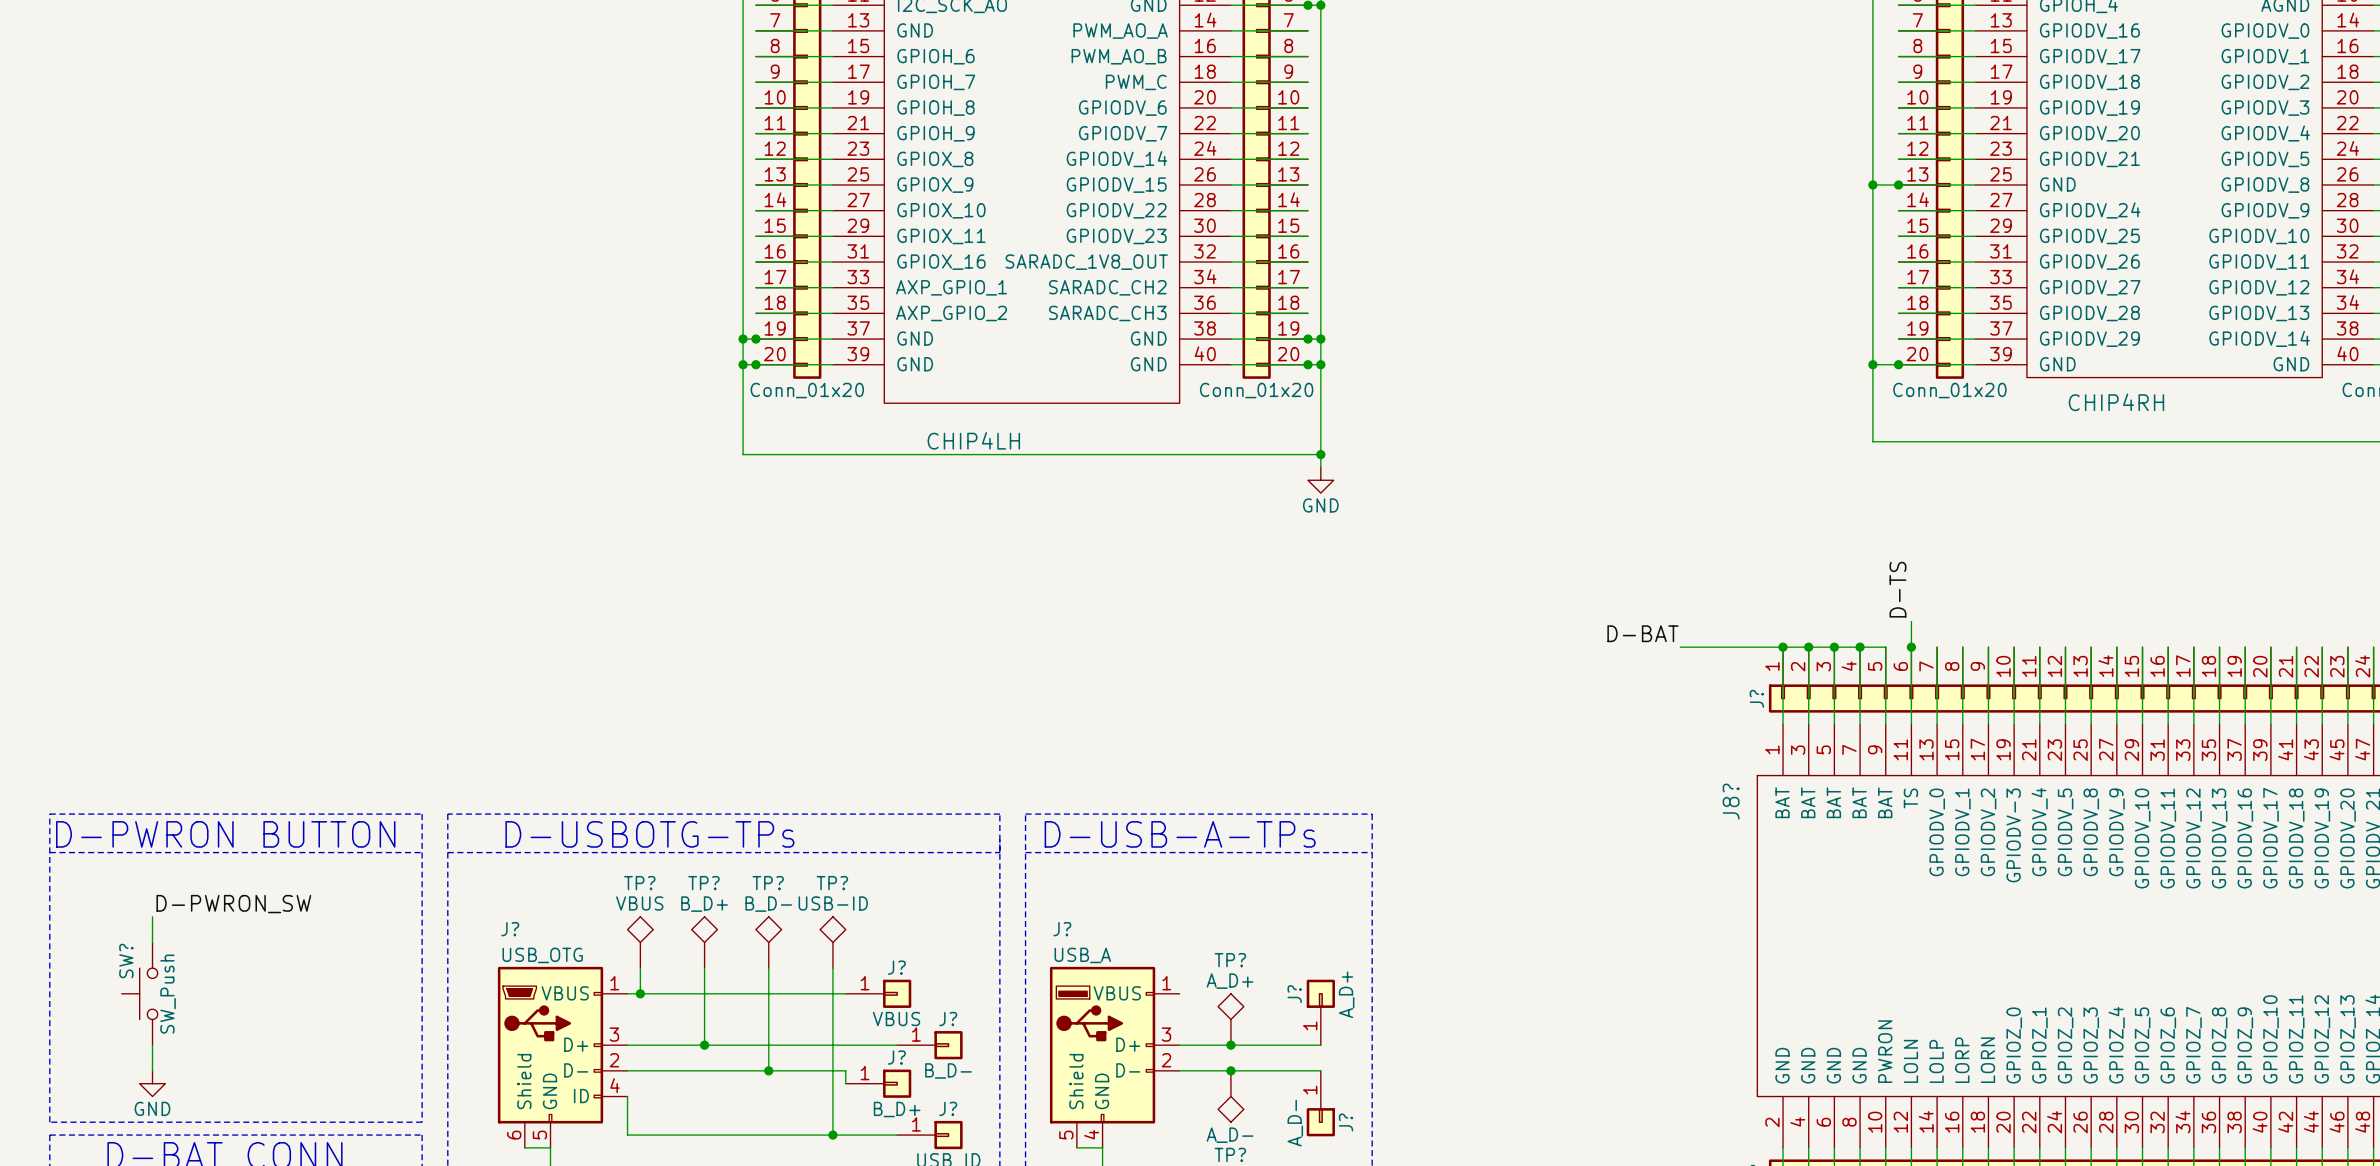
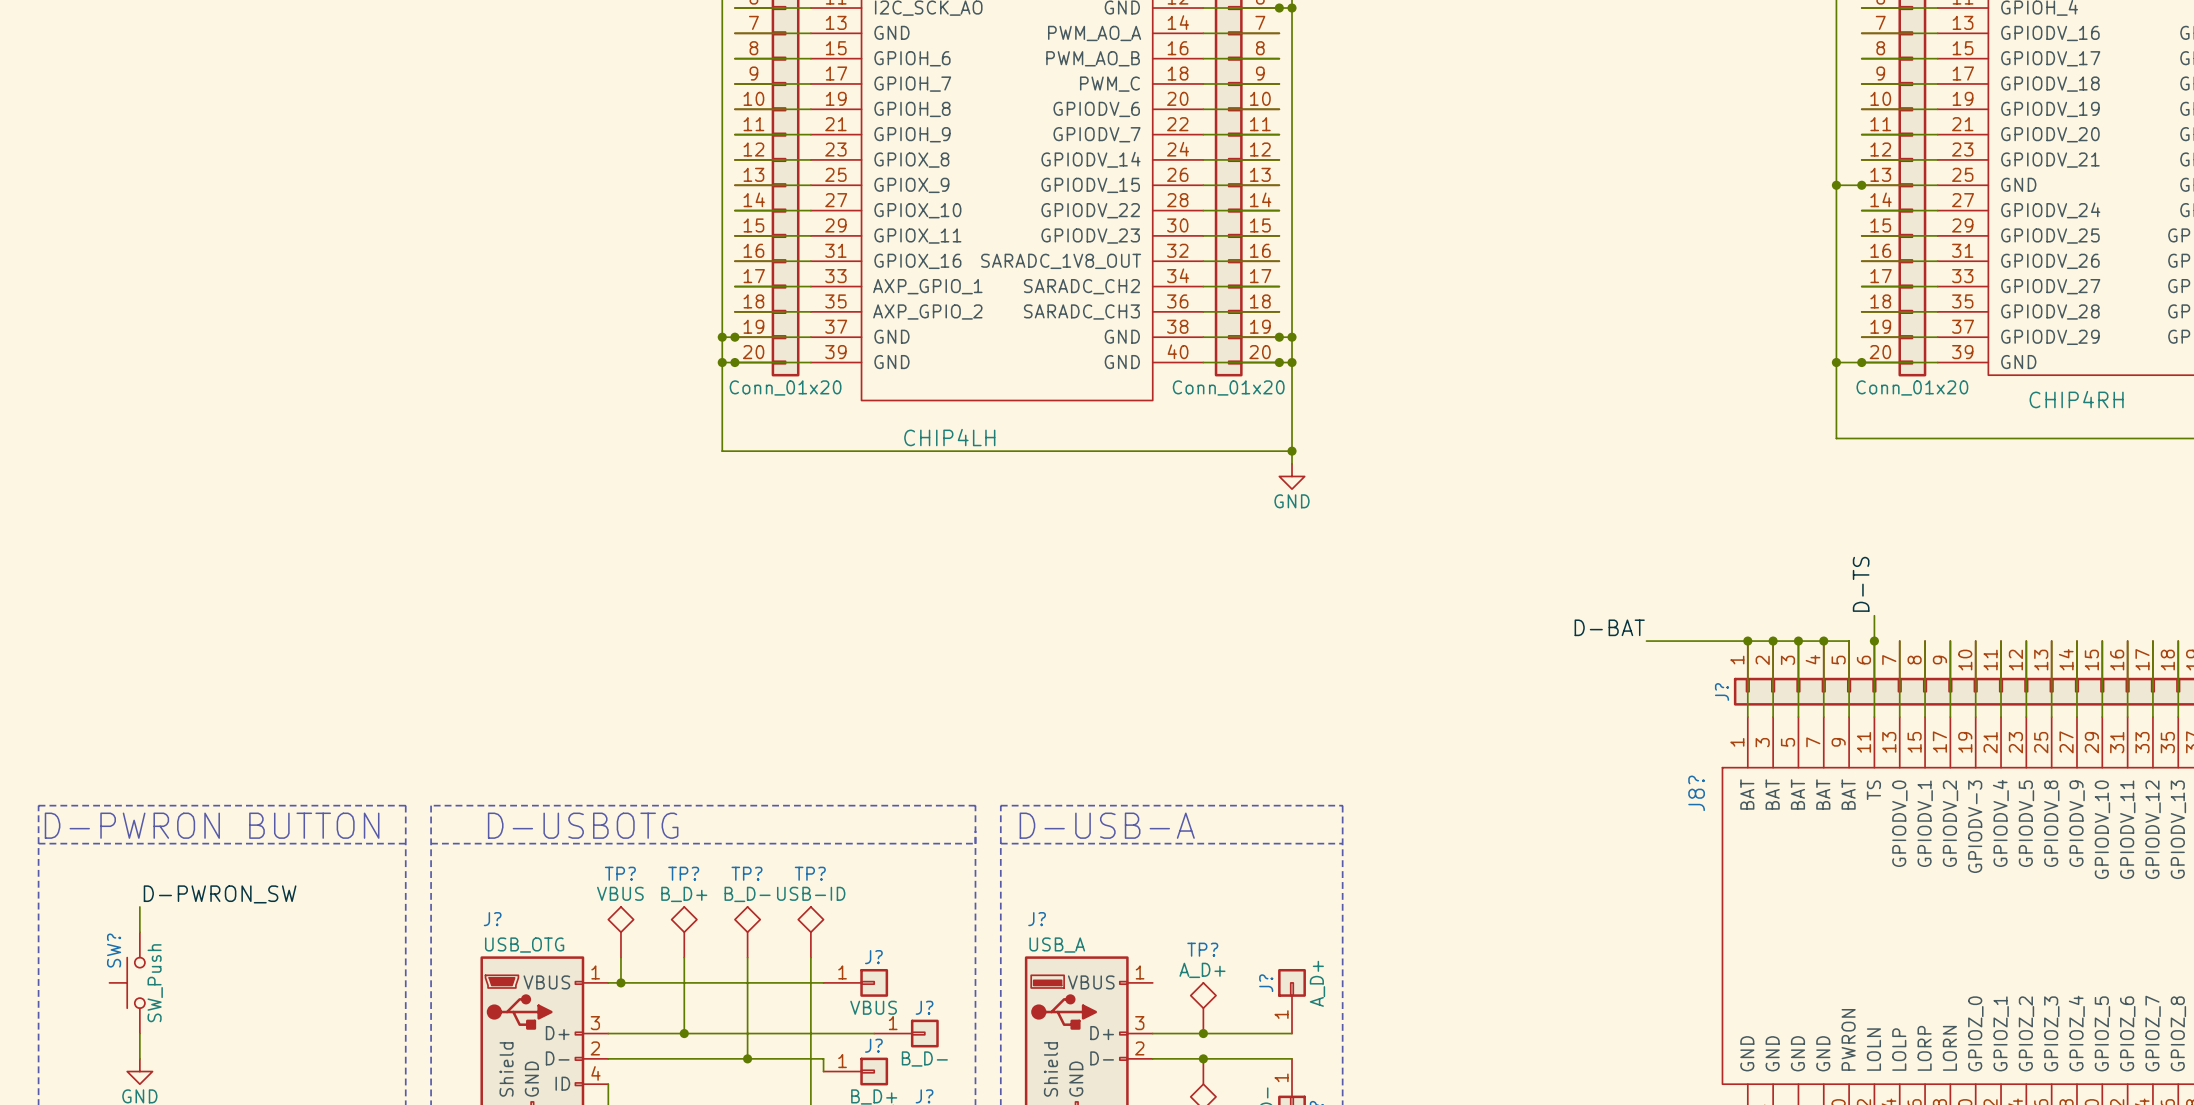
text: D-USBOTG-TPs (649, 834) -> D-USBOTG (583, 825)
text: D-USB-A-TPs (1180, 834) -> D-USB-A (1107, 825)

